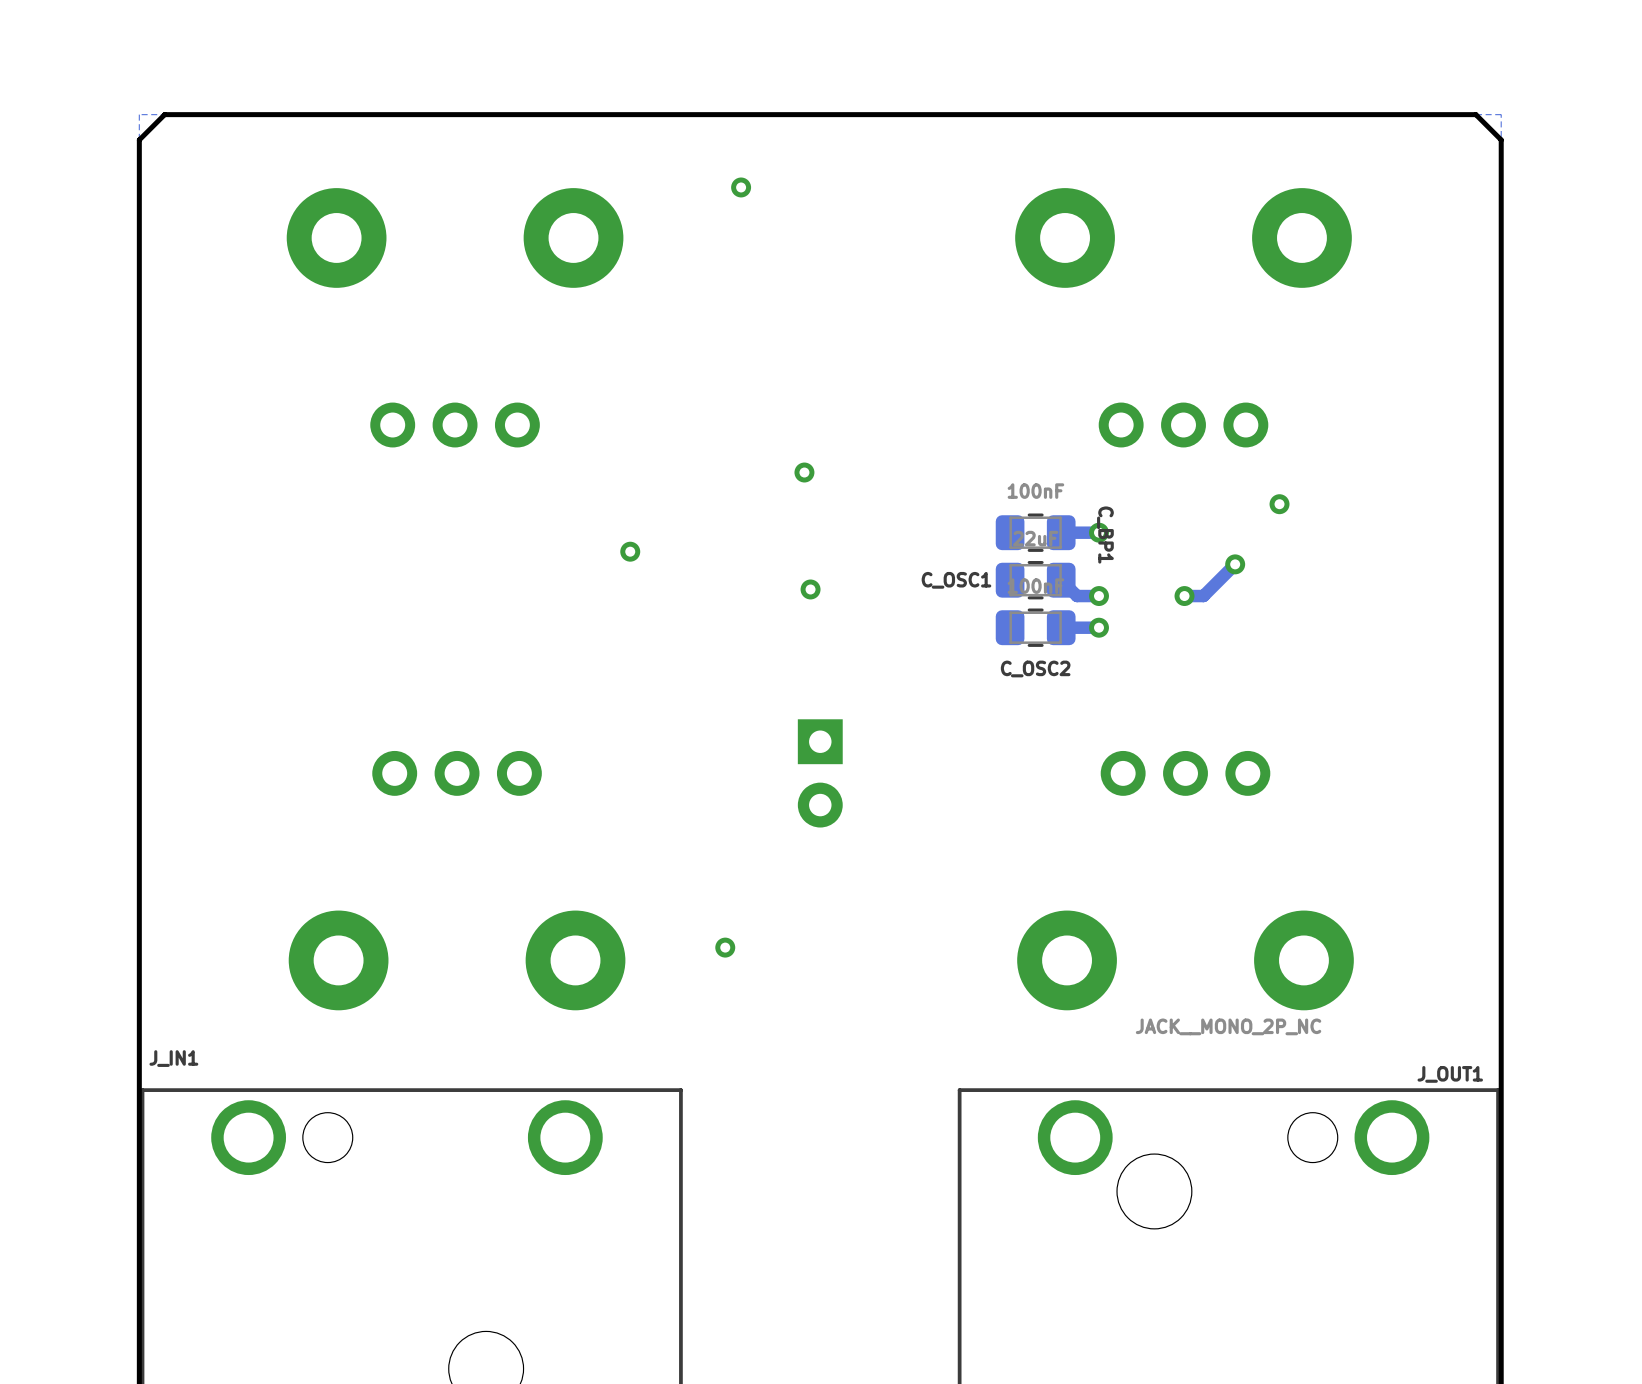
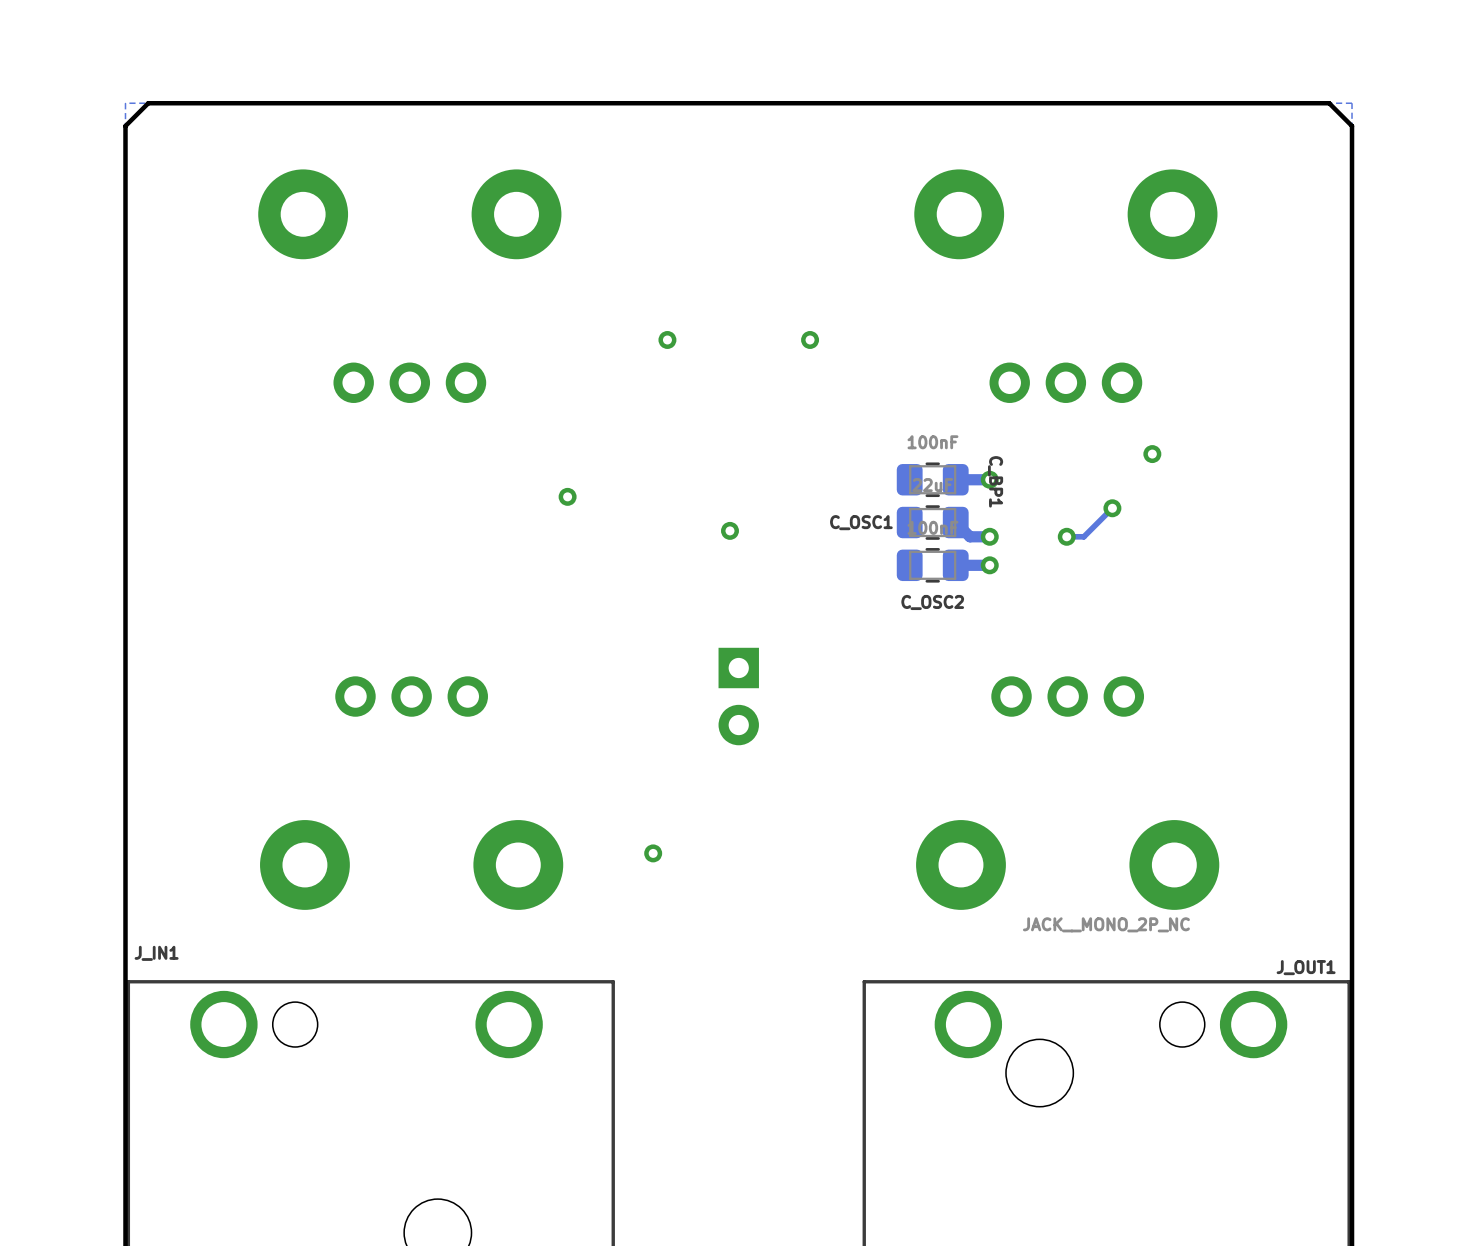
via: (741, 187) -> none
via: none -> (667, 339)
via: none -> (810, 339)
via: (804, 472) -> none
track width: thick (1235, 564) (1203, 596) (1184, 596) -> thin (1112, 508) (1083, 536) (1066, 536)

